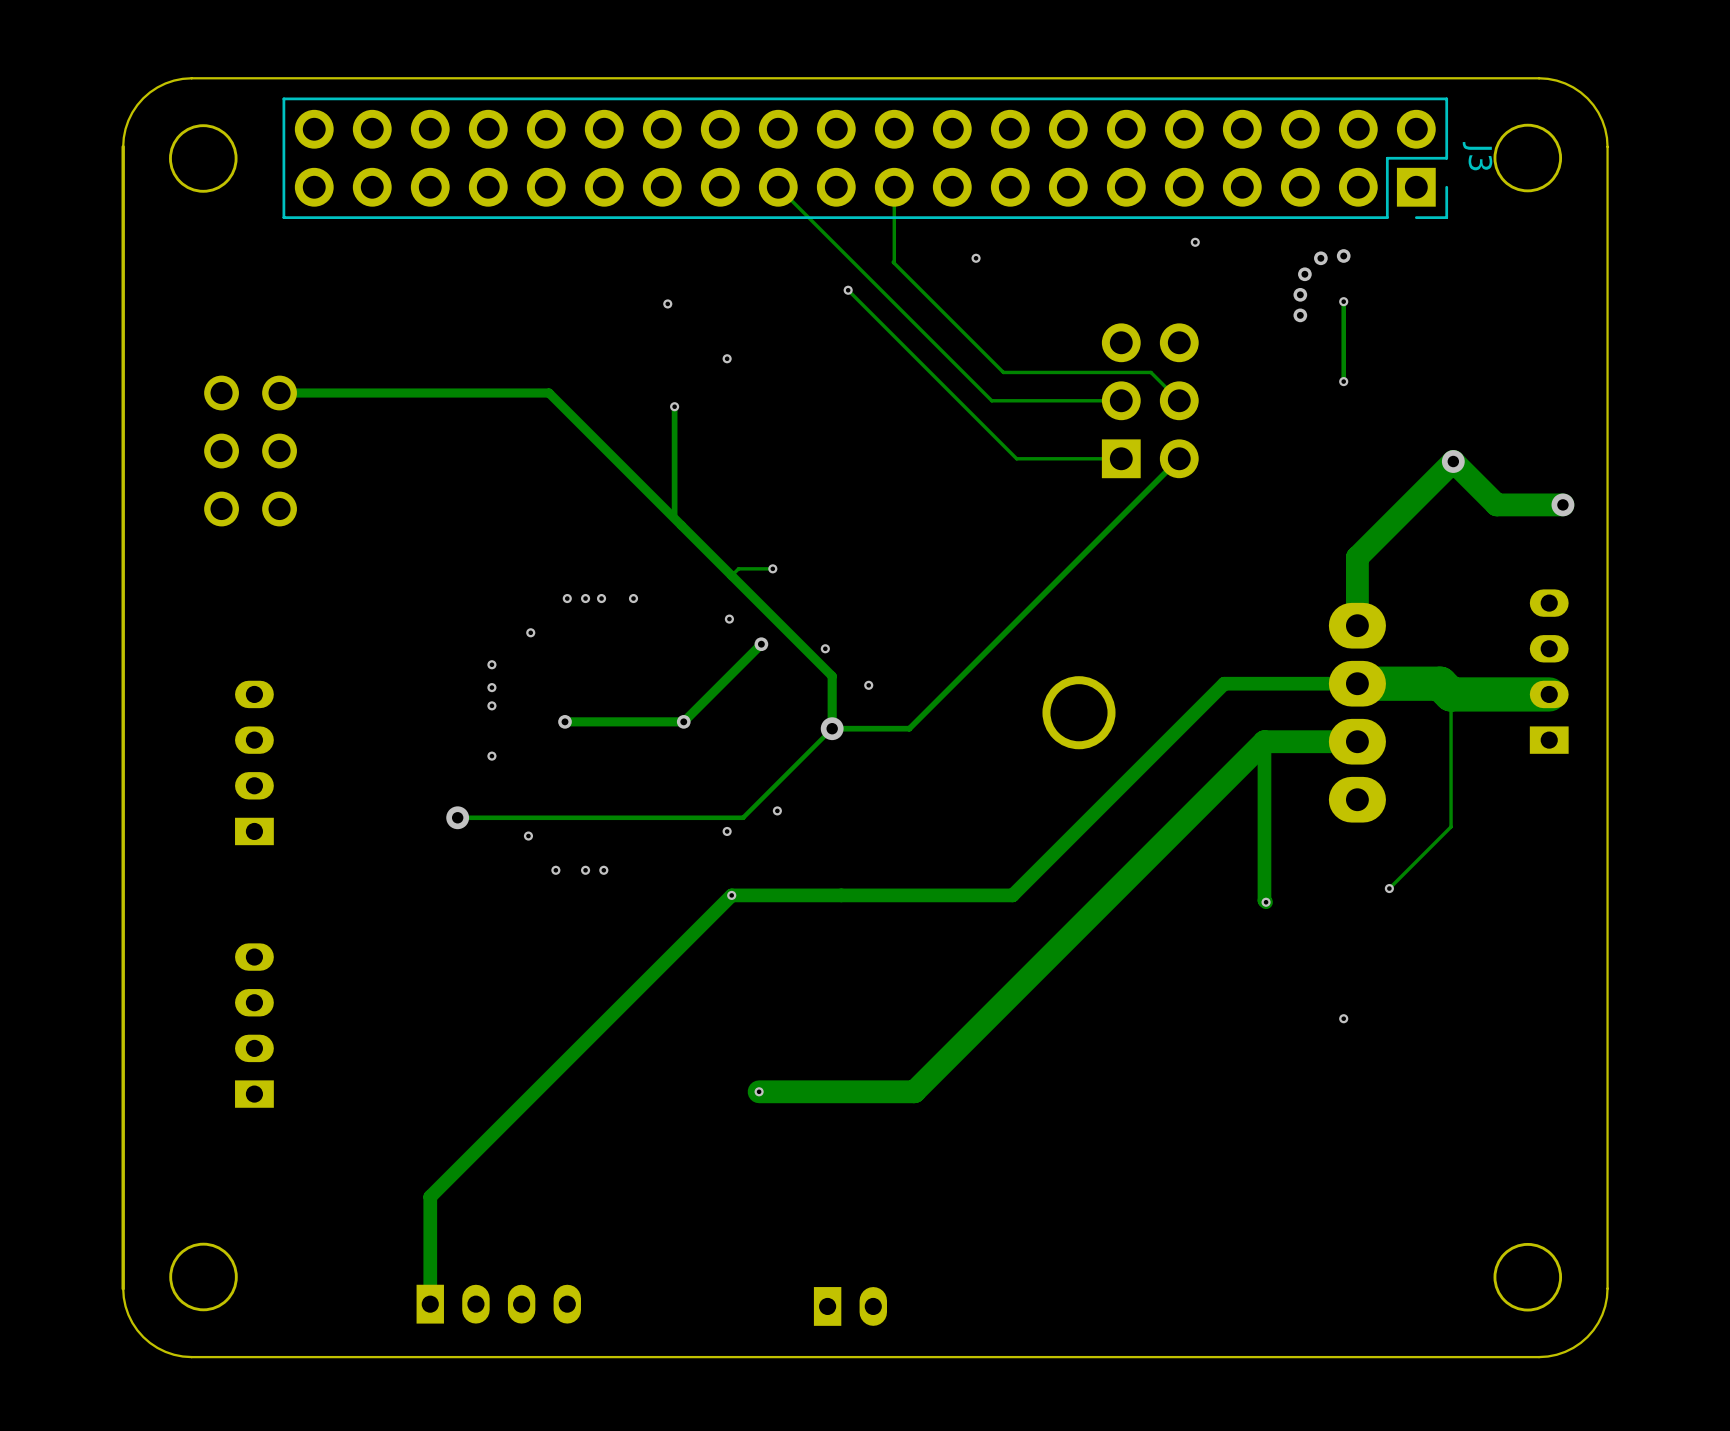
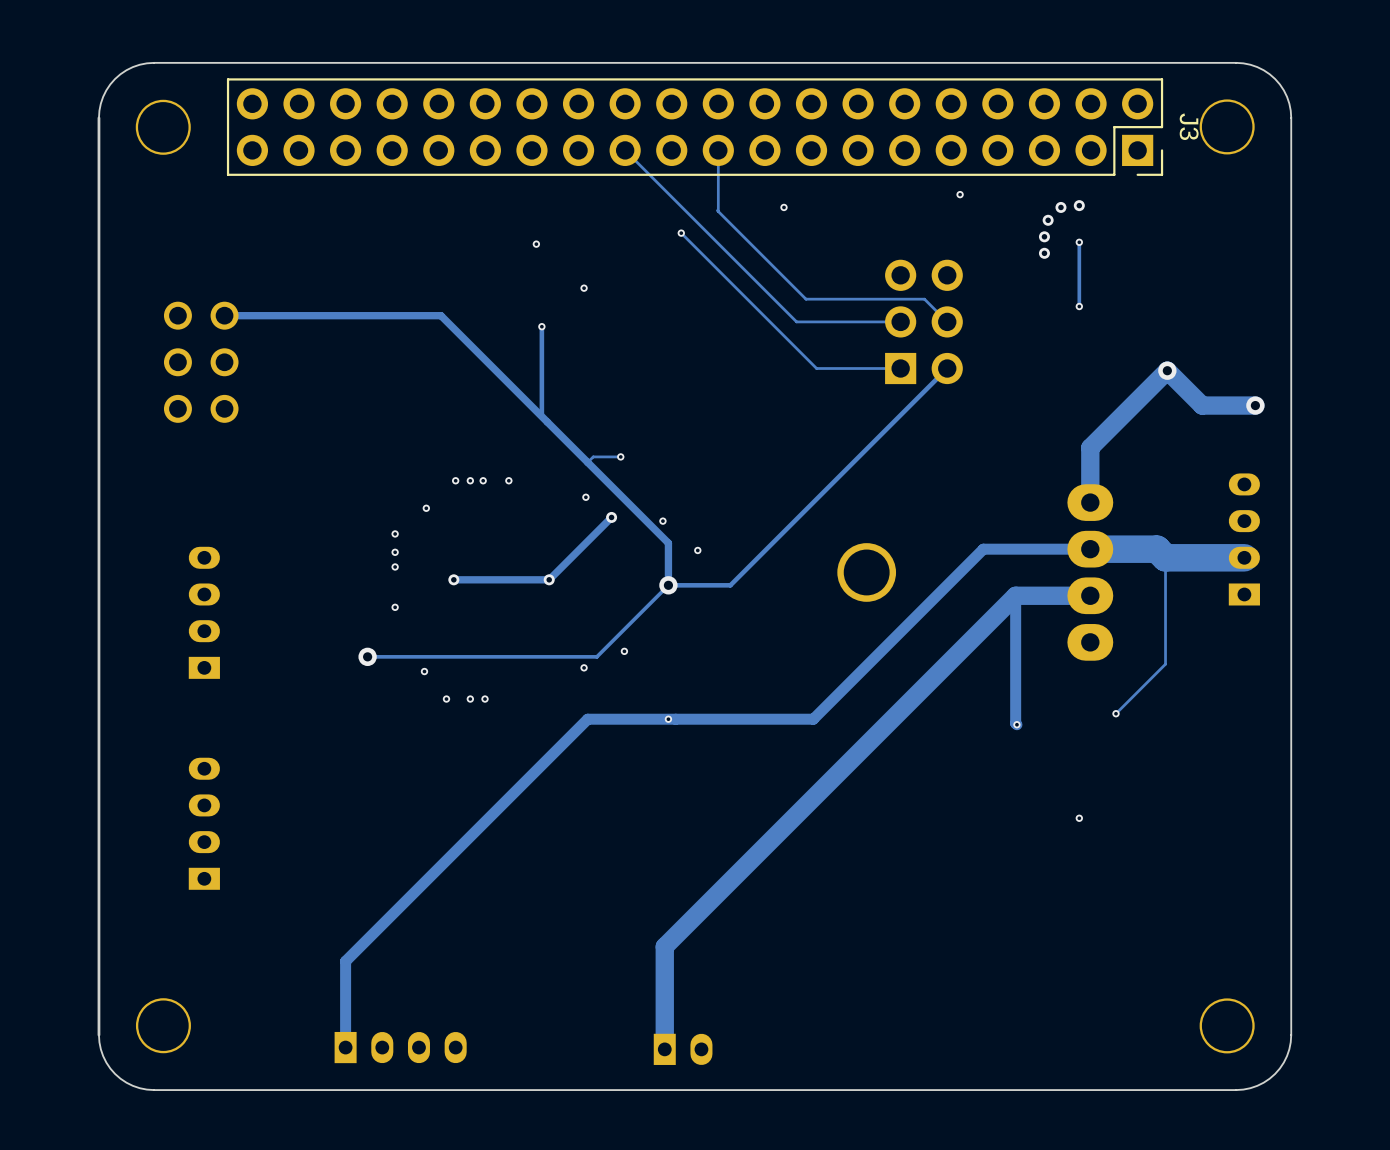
via position: (731, 895) -> (668, 719)
via: (759, 1091) -> none
track: (914, 1091) (759, 1091) -> (734, 876) (664, 946) (664, 1049)

